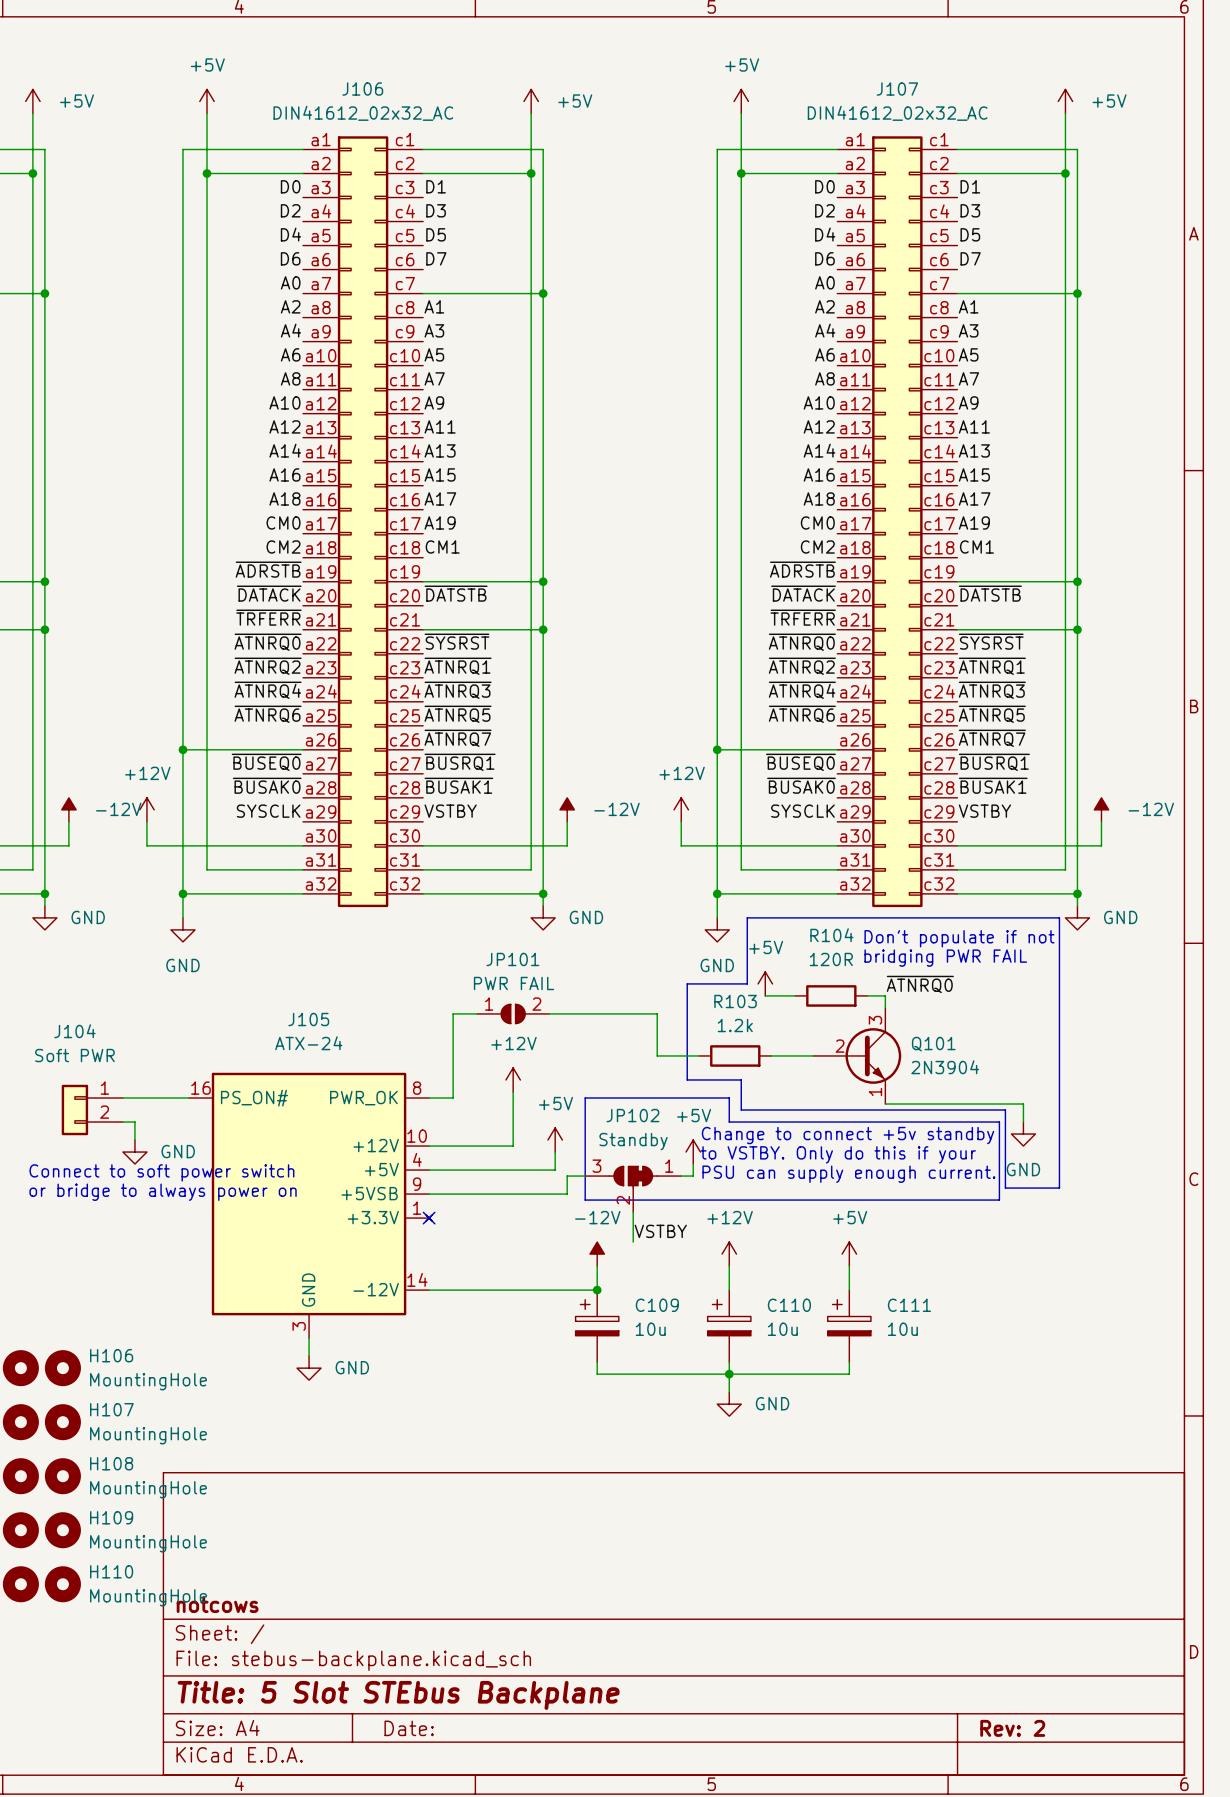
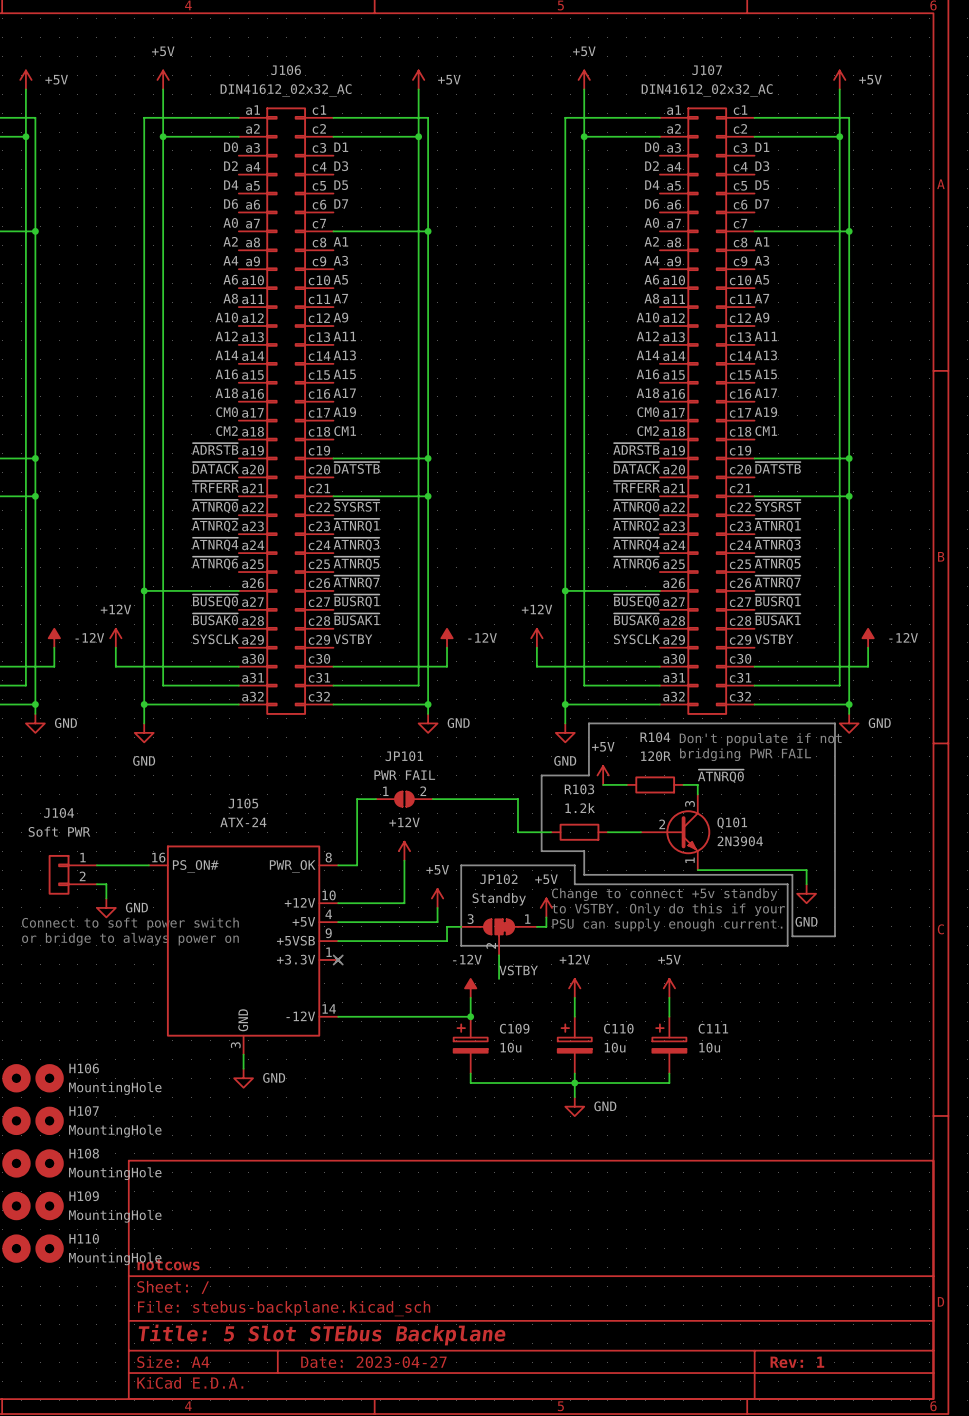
title block: Date: (409, 1728) -> Date: 2023-04-27 (373, 1362)
title block: Rev: 2 (1012, 1728) -> Rev: 1 (797, 1362)

